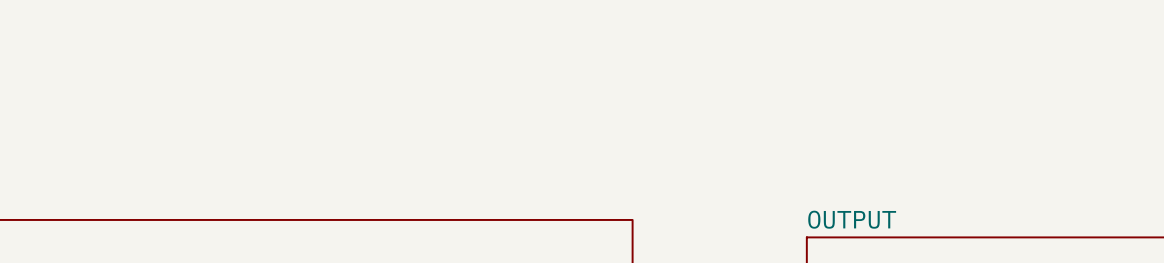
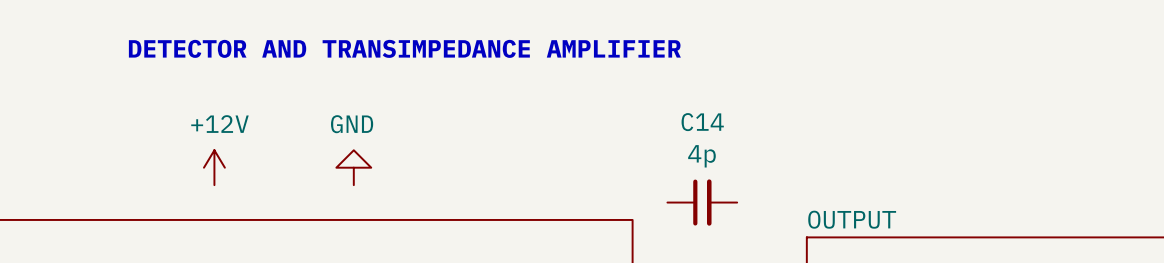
text: none -> DETECTOR AND TRANSIMPEDANCE AMPLIFIER (404, 48)
power symbol: none -> +12V (214, 167)
power symbol: none -> GND (353, 167)
C14: none -> 4p (702, 202)

